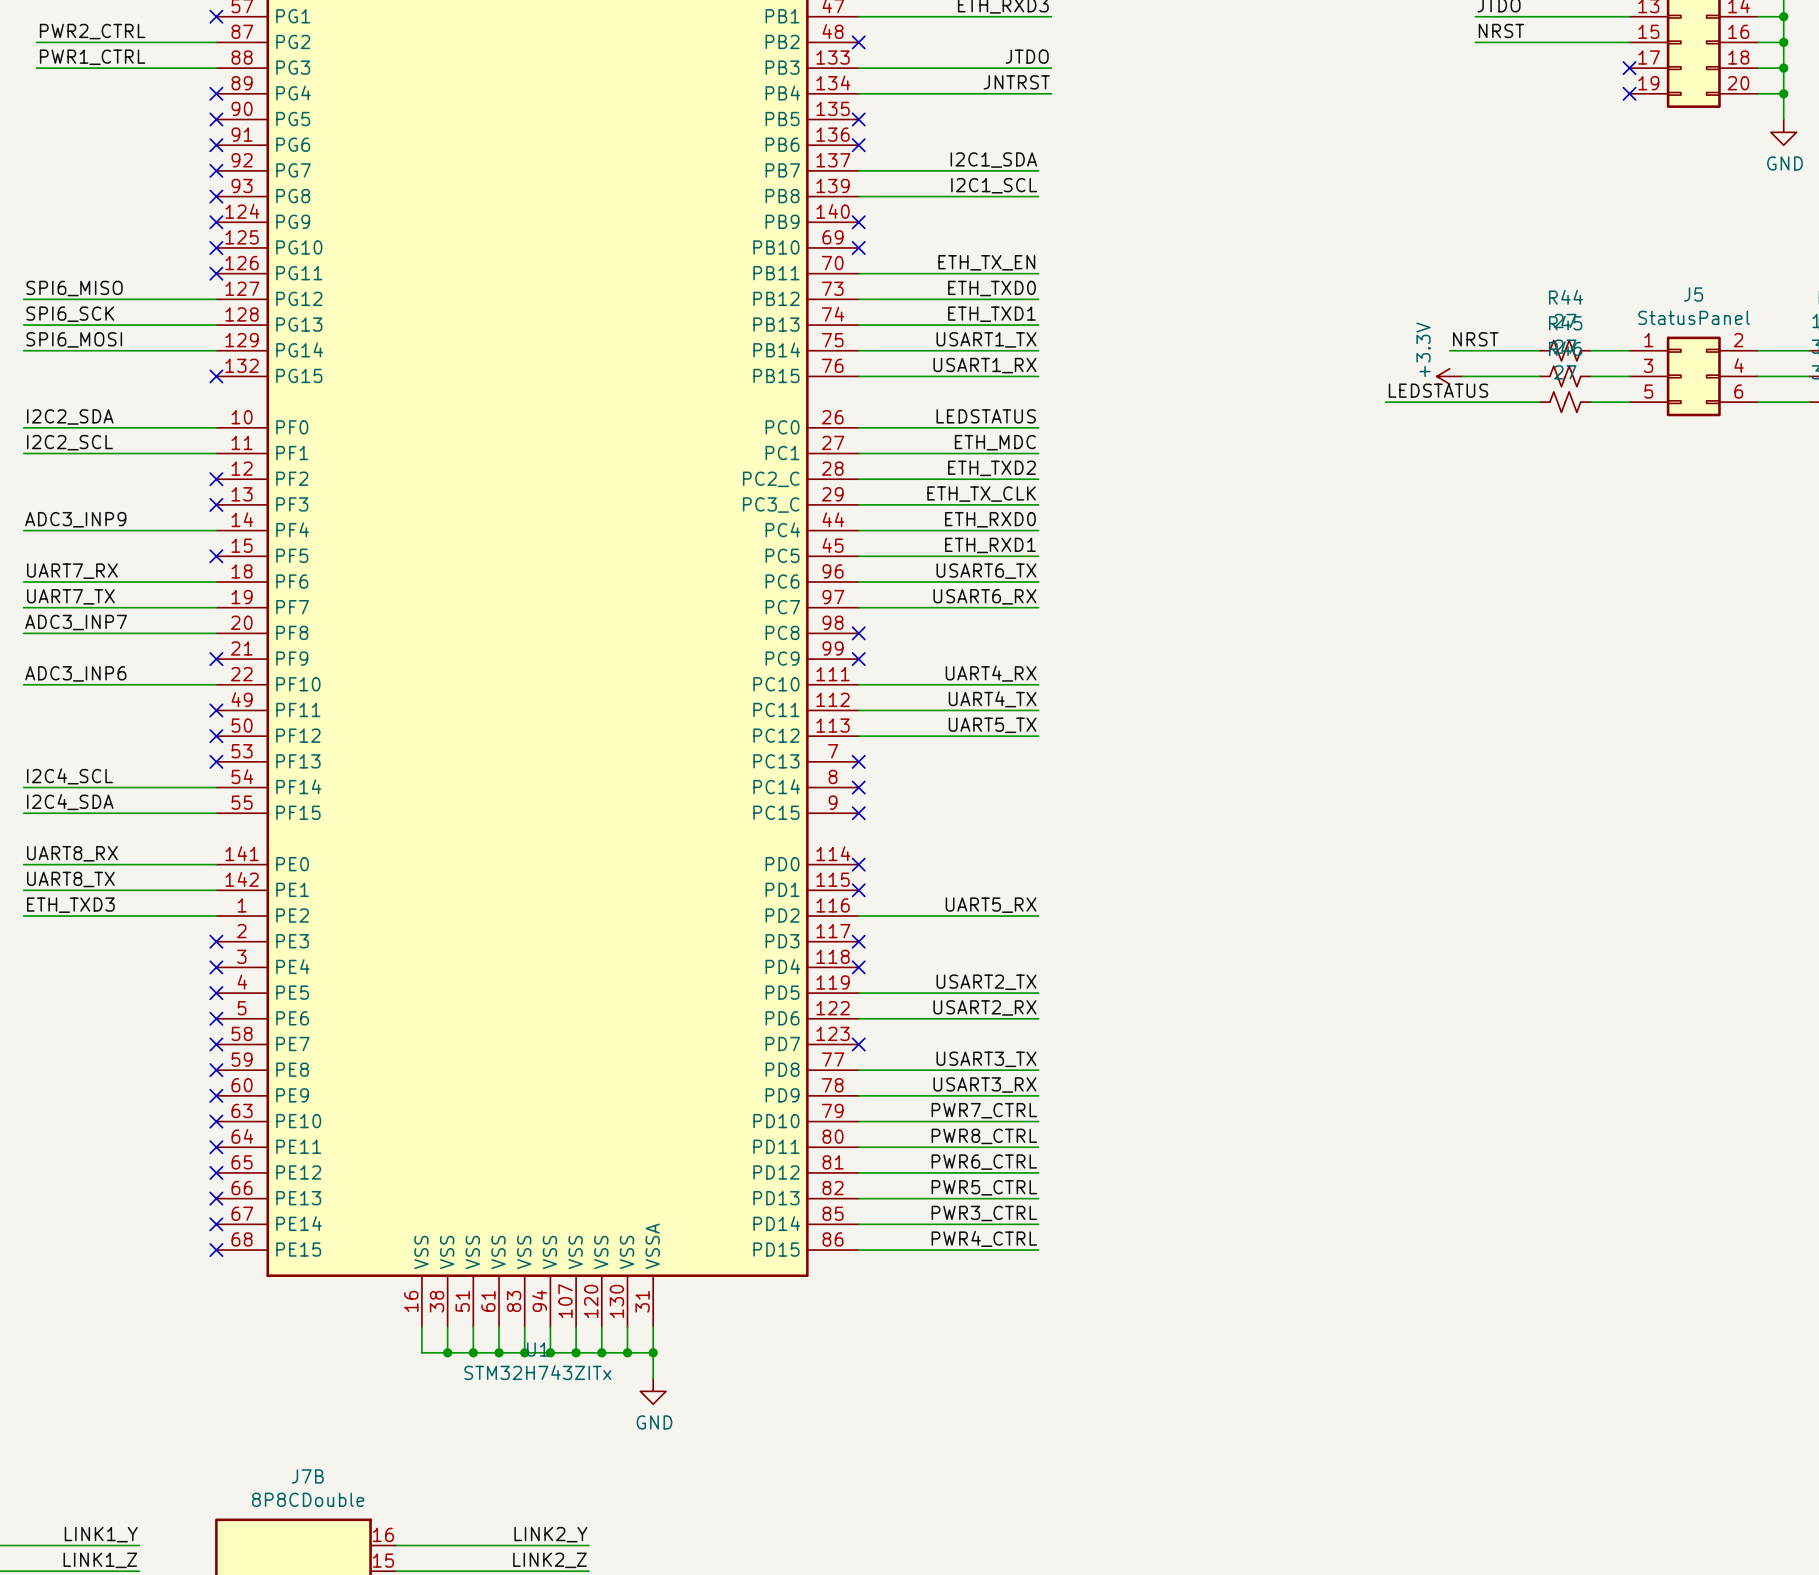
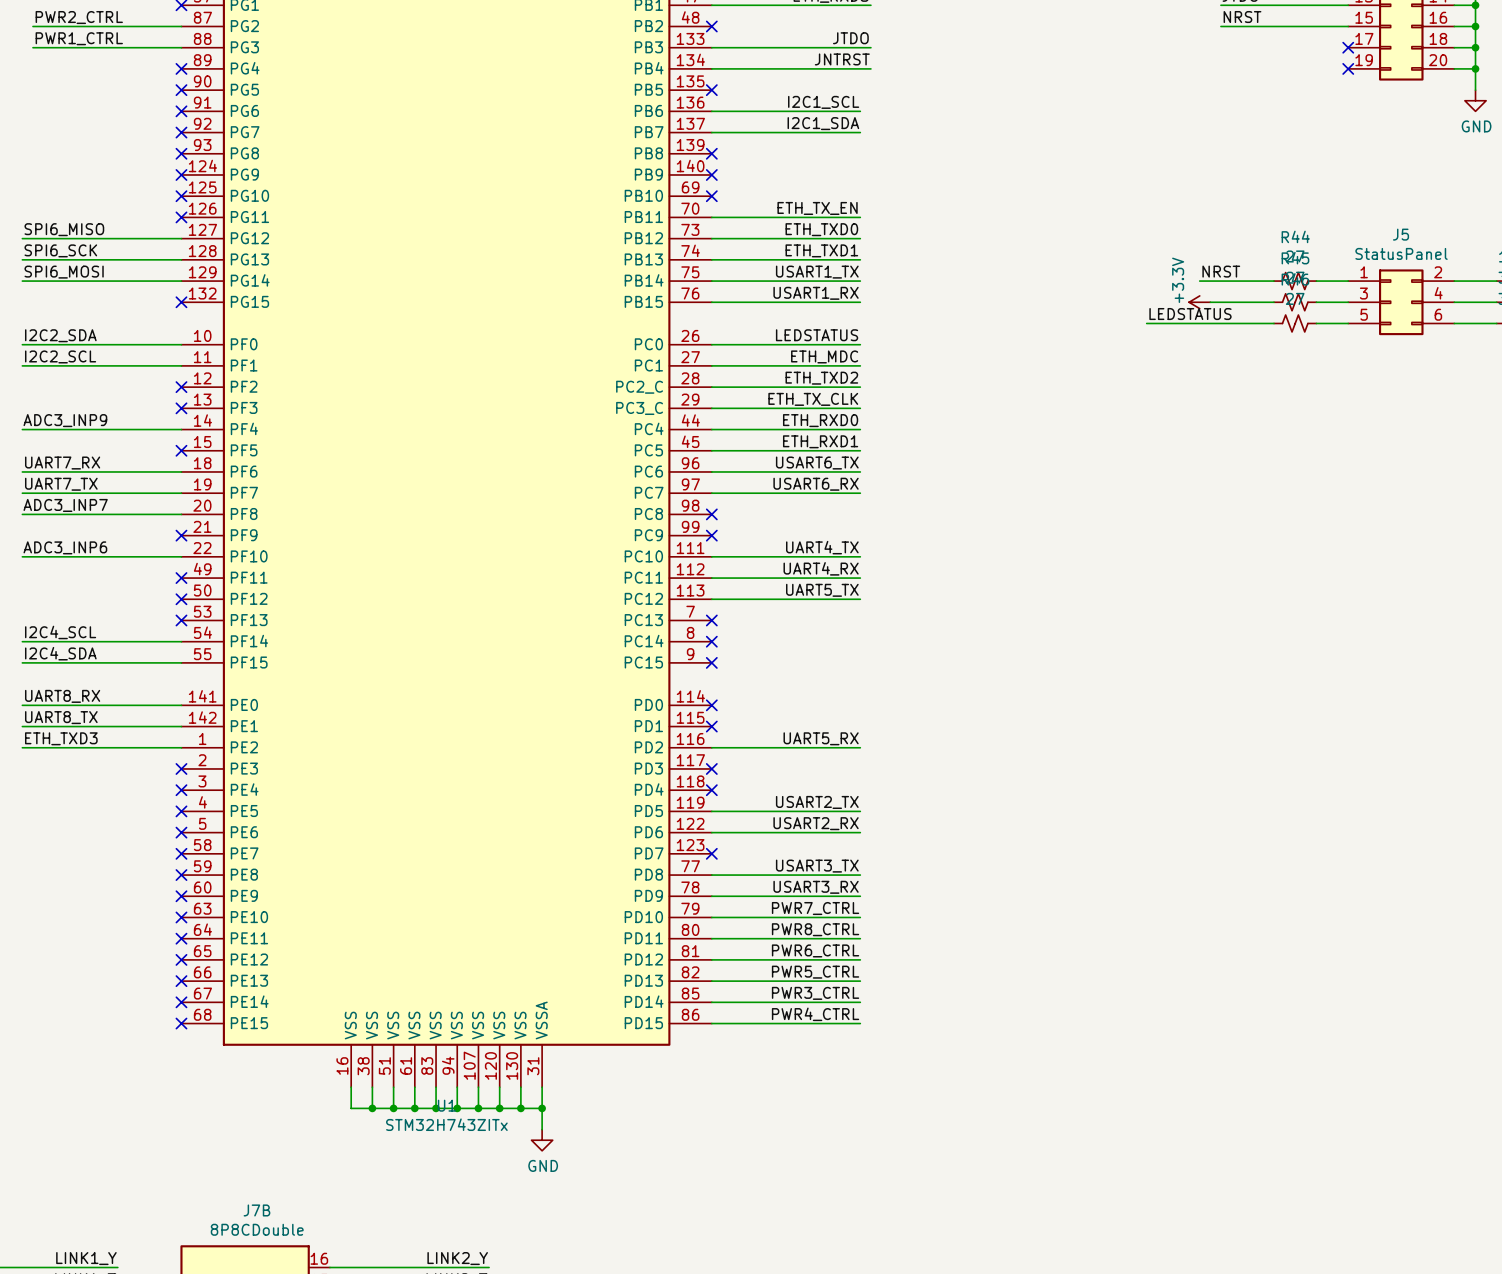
no-connect mark position: (858, 145) -> (711, 153)
label position: I2C1_SCL (994, 185) -> I2C1_SCL (823, 102)
wire: (858, 196) (1038, 196) -> (711, 111) (860, 111)
label: UART4_RX (991, 673) -> UART4_TX (822, 547)
label: UART4_TX (992, 699) -> UART4_RX (821, 568)

